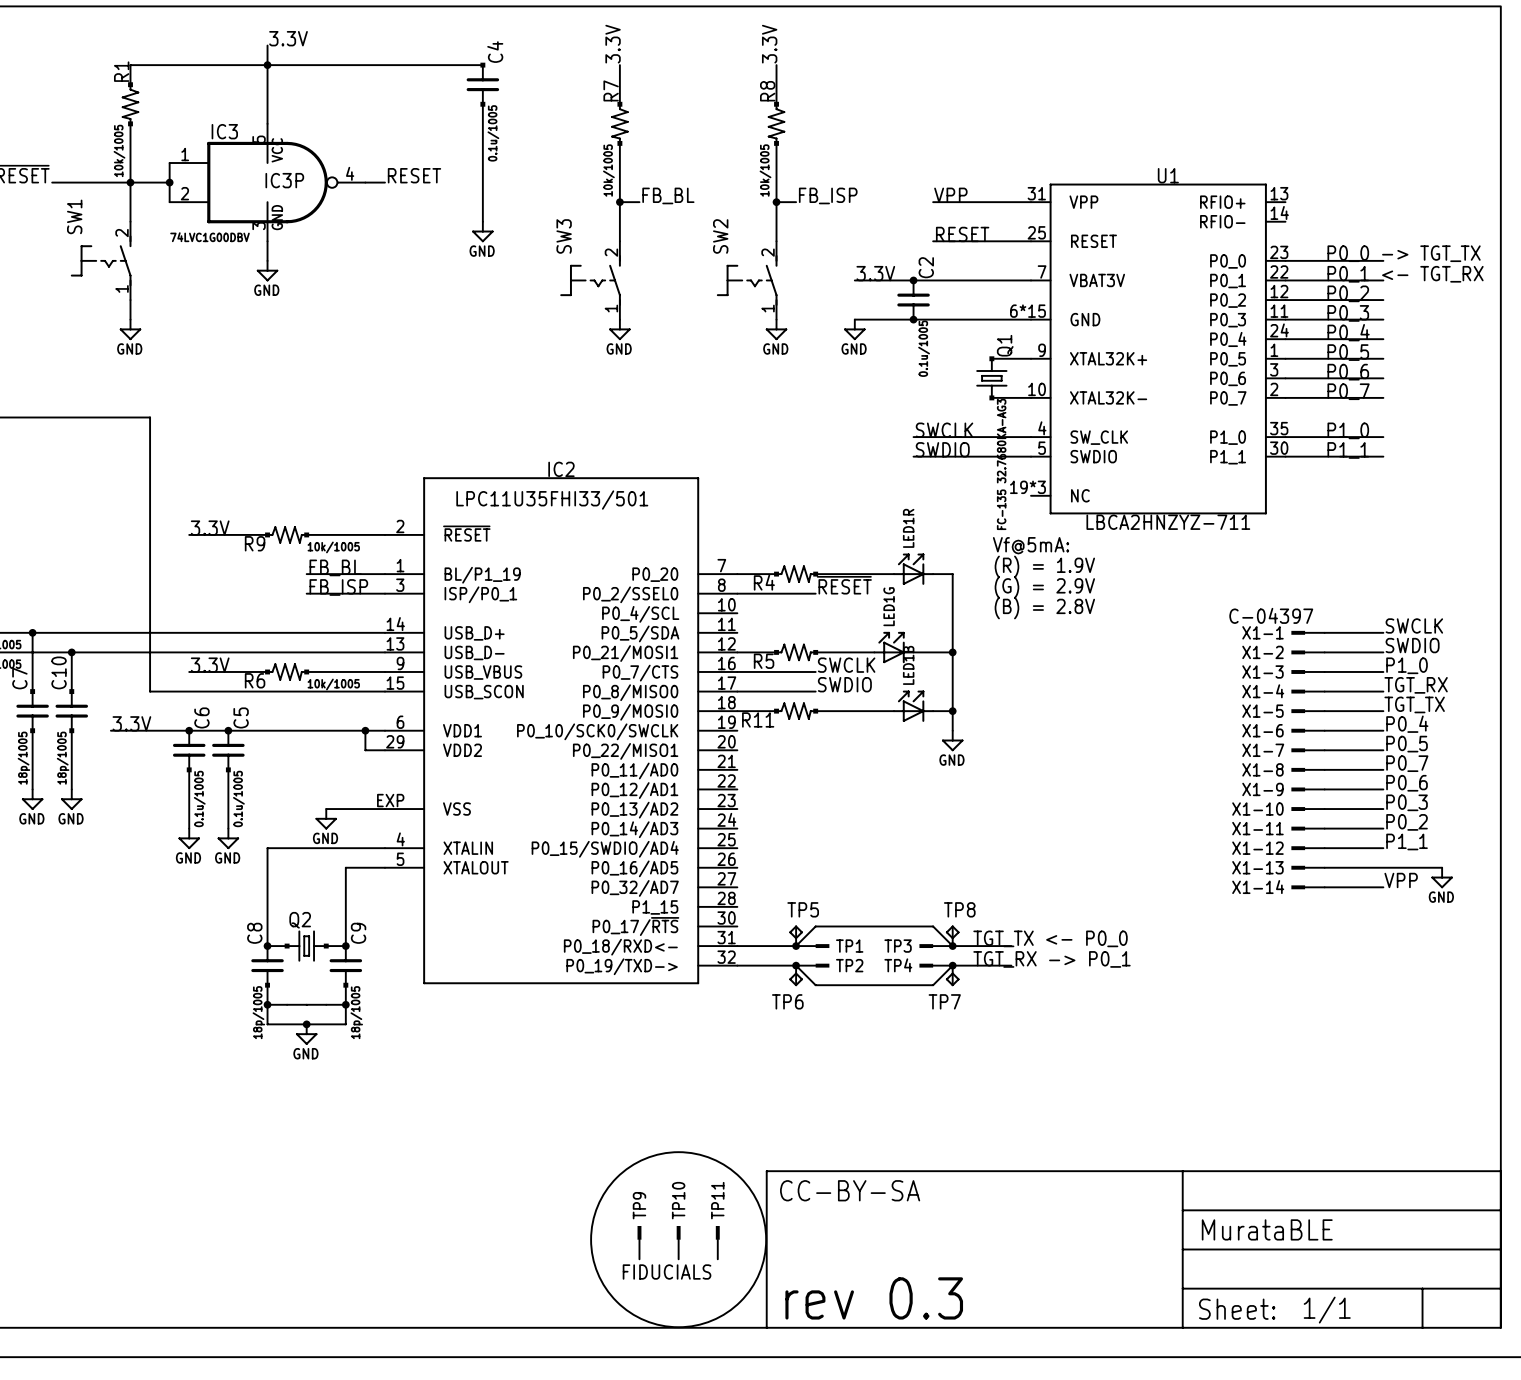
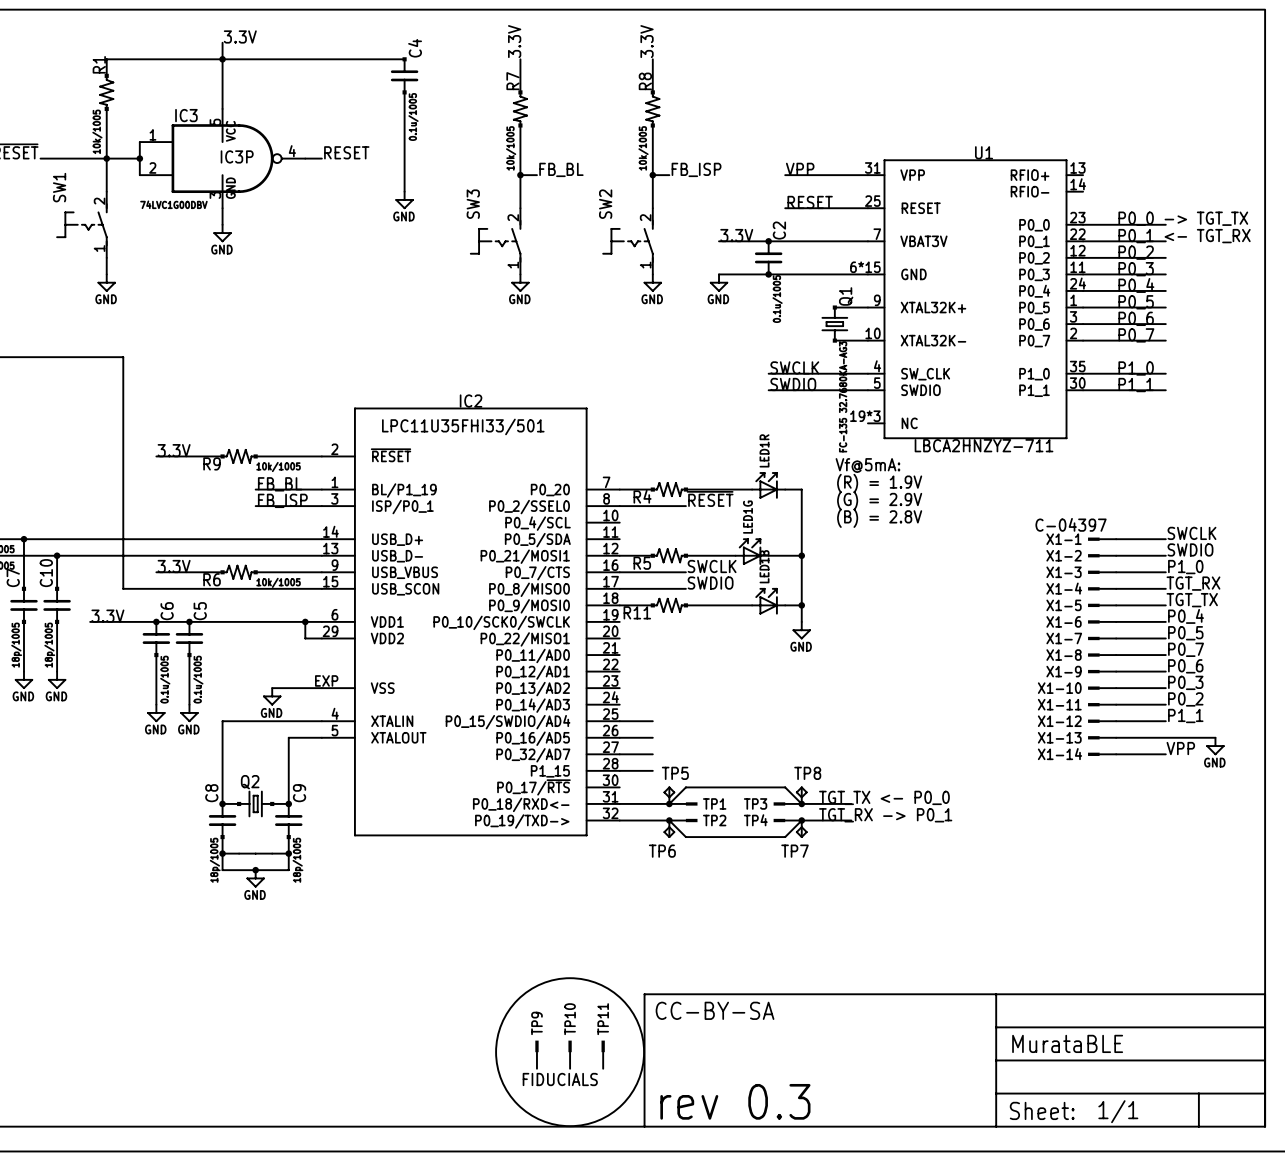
wire: none -> (619, 721) (652, 721)
wire: none -> (619, 737) (652, 737)
wire: none -> (619, 754) (652, 754)
wire: none -> (619, 770) (652, 770)

